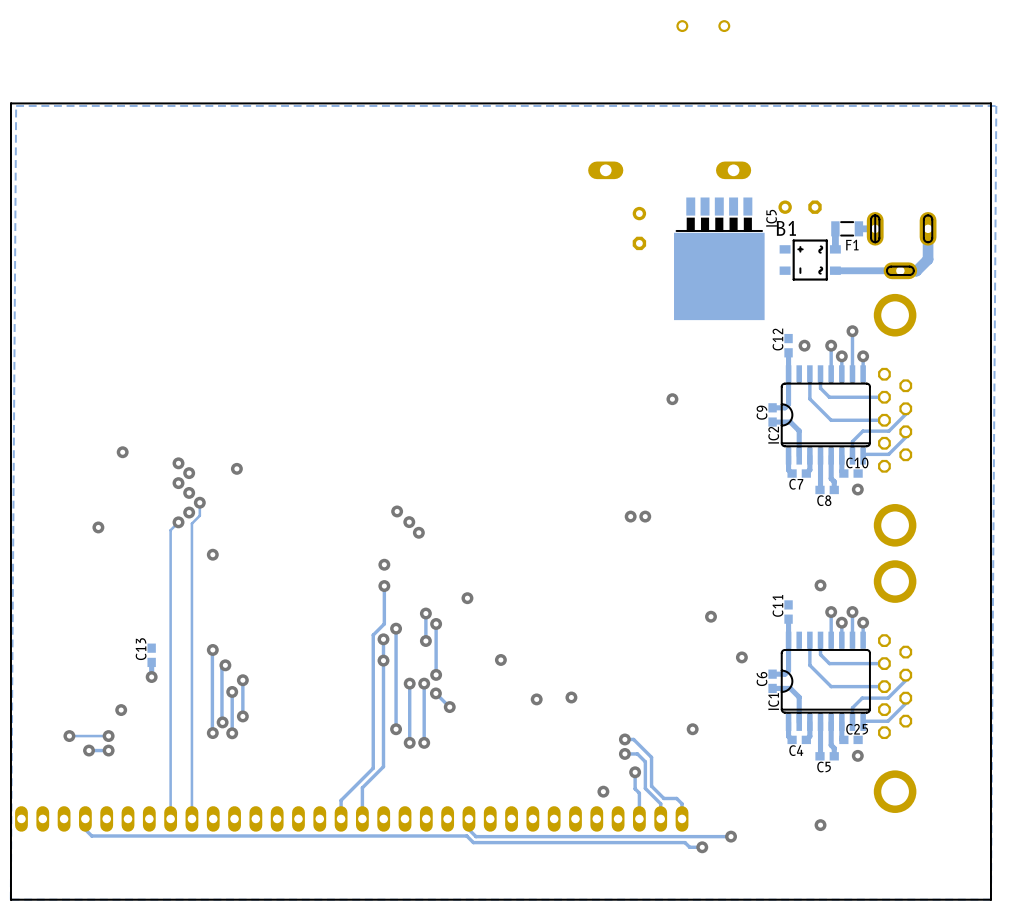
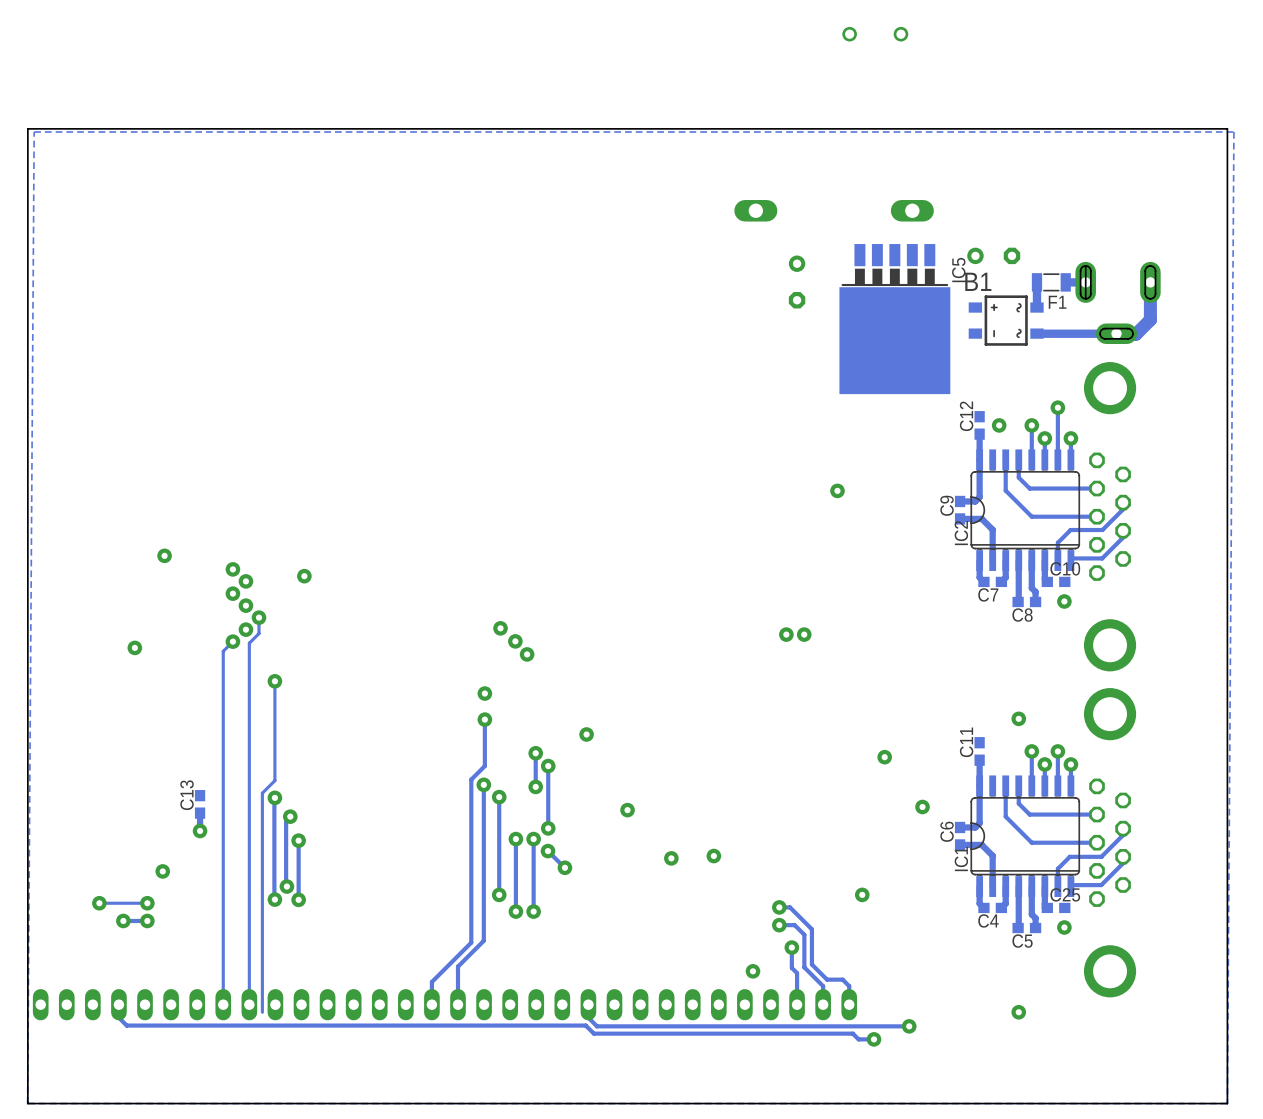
track: none -> (274, 681) (274, 780) (262, 793) (262, 1012)
track: (396, 628) (396, 649) -> none
via: (396, 628) -> none
via: none -> (499, 797)
via: (383, 660) -> none
track: (242, 680) (242, 716) -> none
via: (242, 680) -> none
via: none -> (298, 840)
via: (232, 691) -> none
via: (242, 716) -> none

